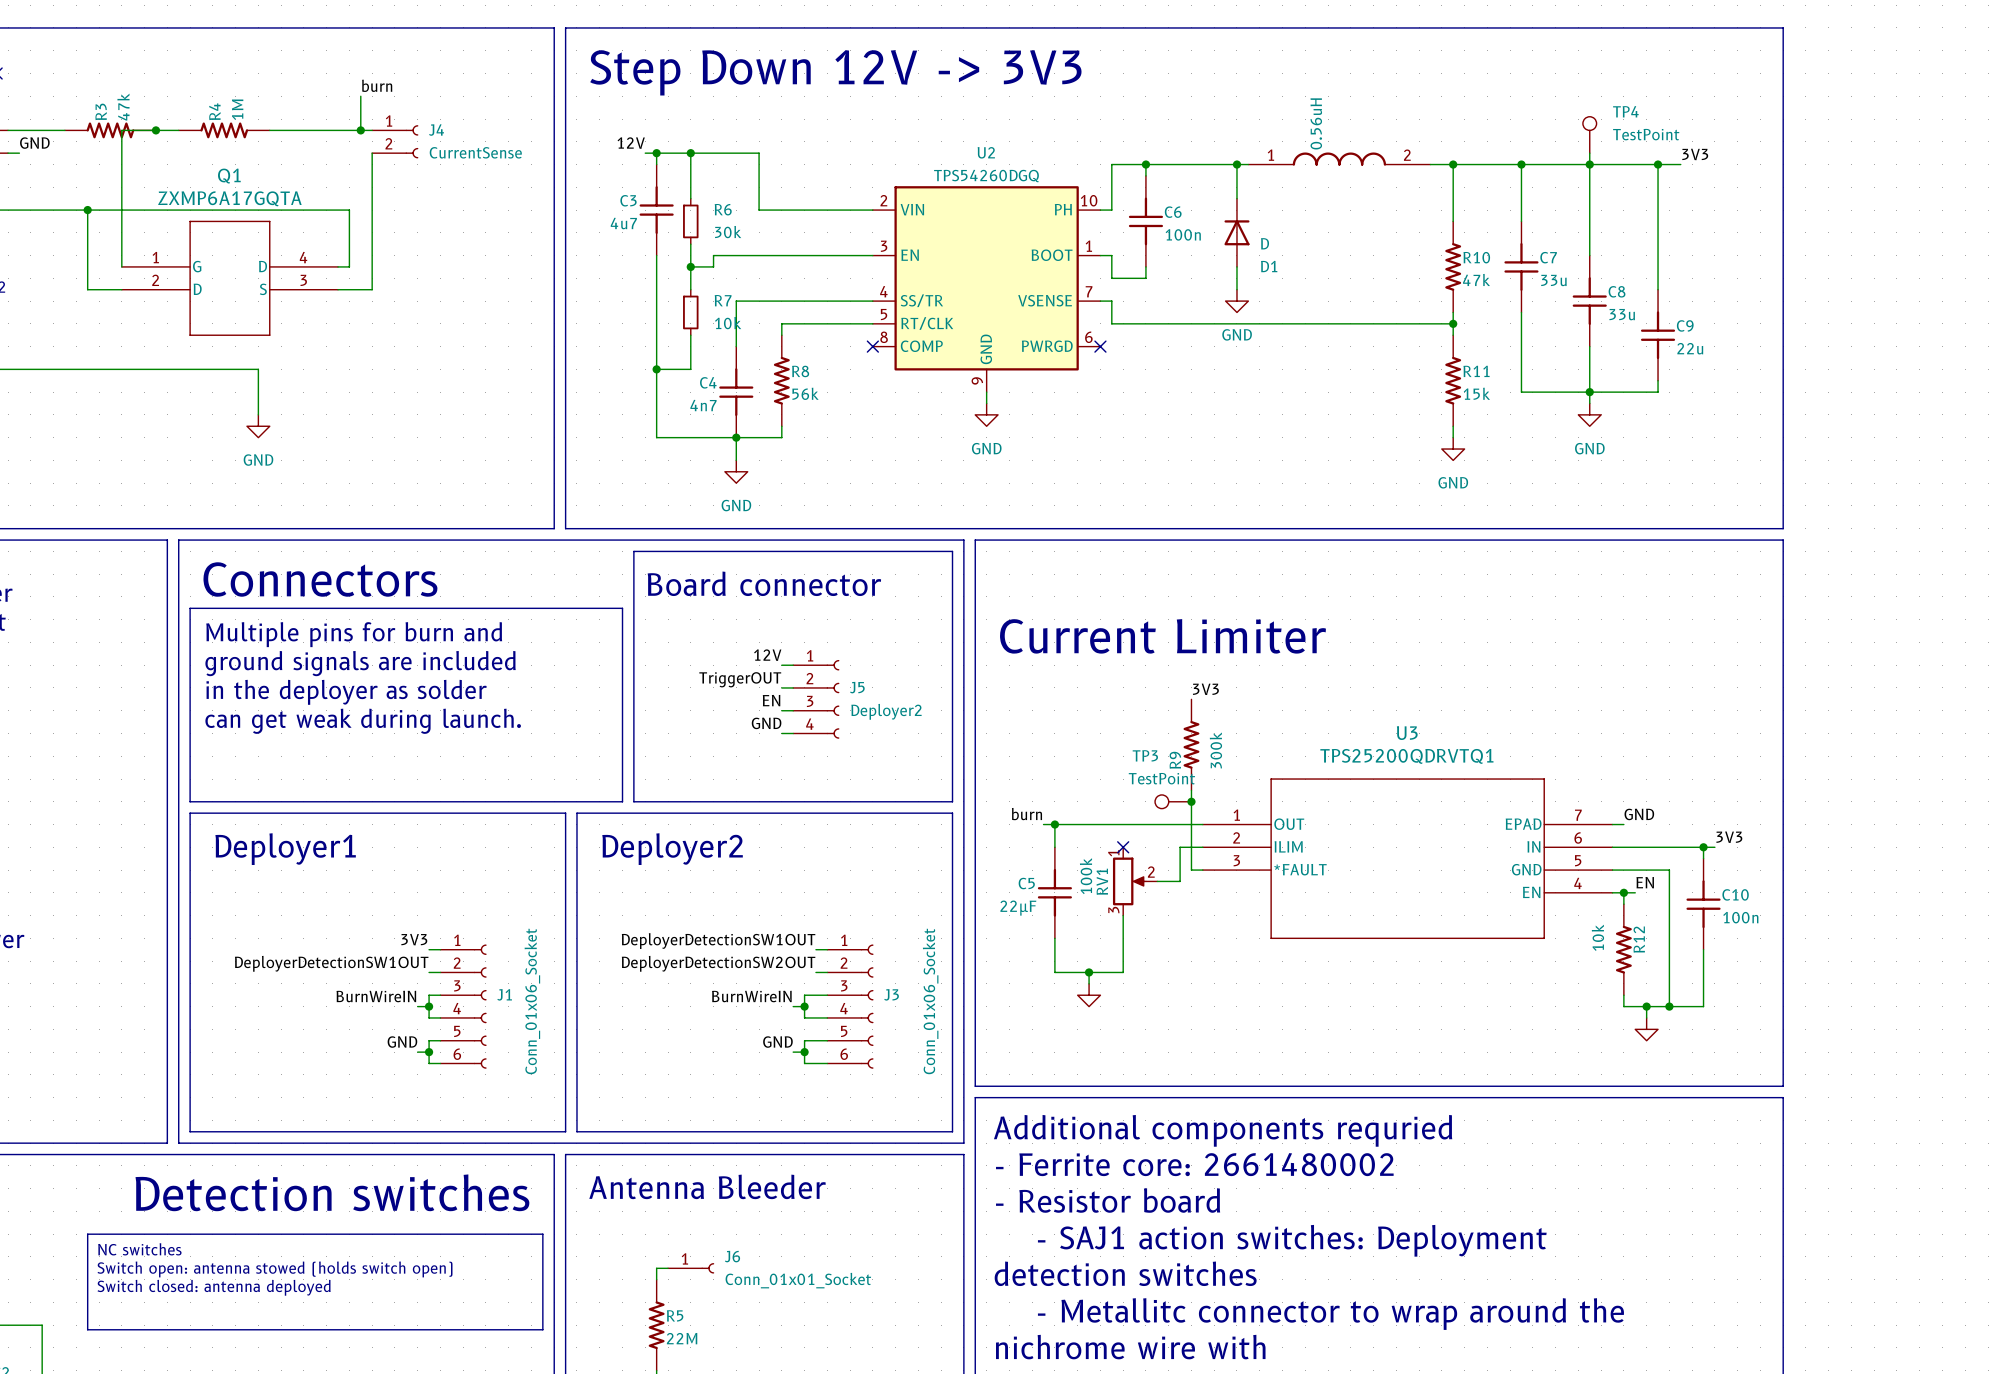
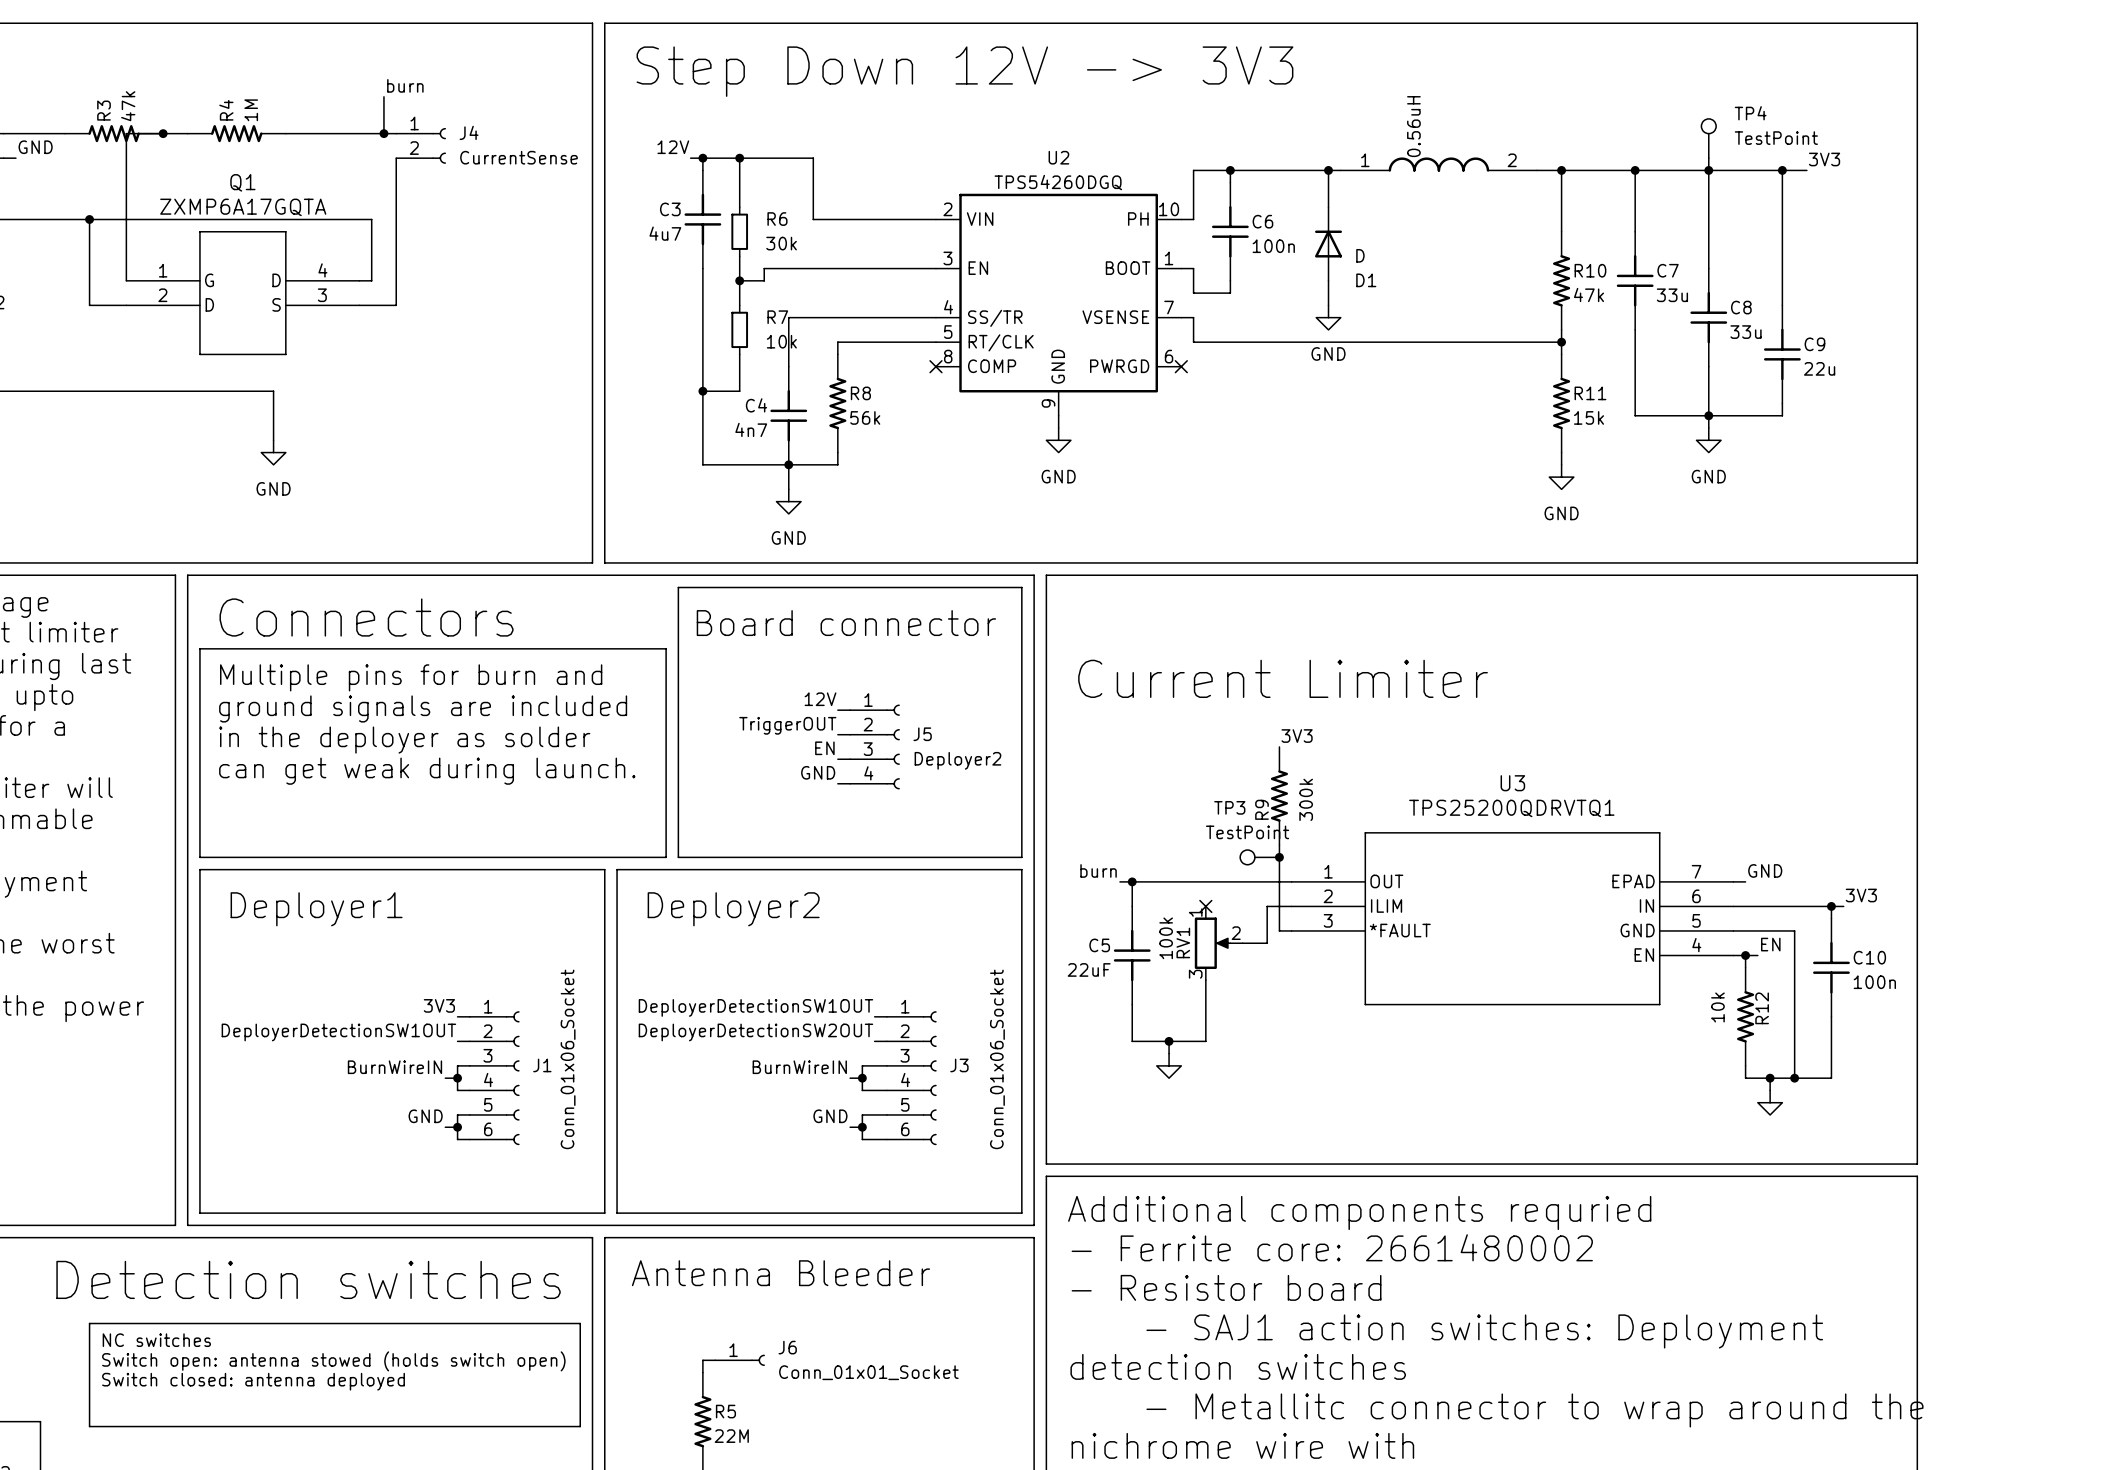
C5 value: 22µF (1018, 908) -> 22uF (1089, 969)

